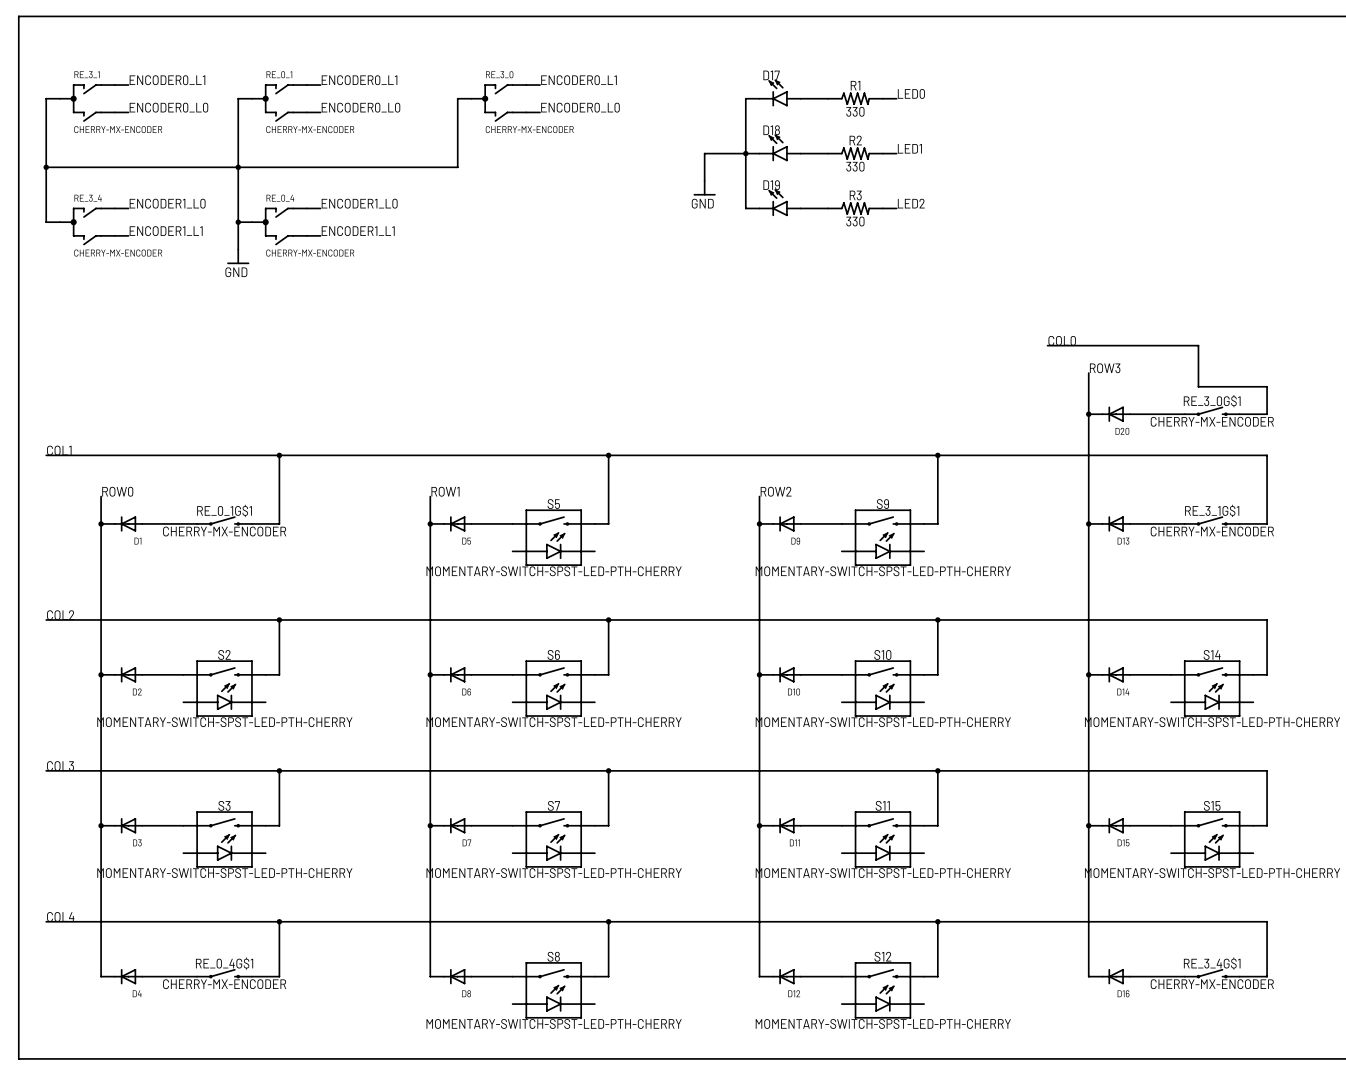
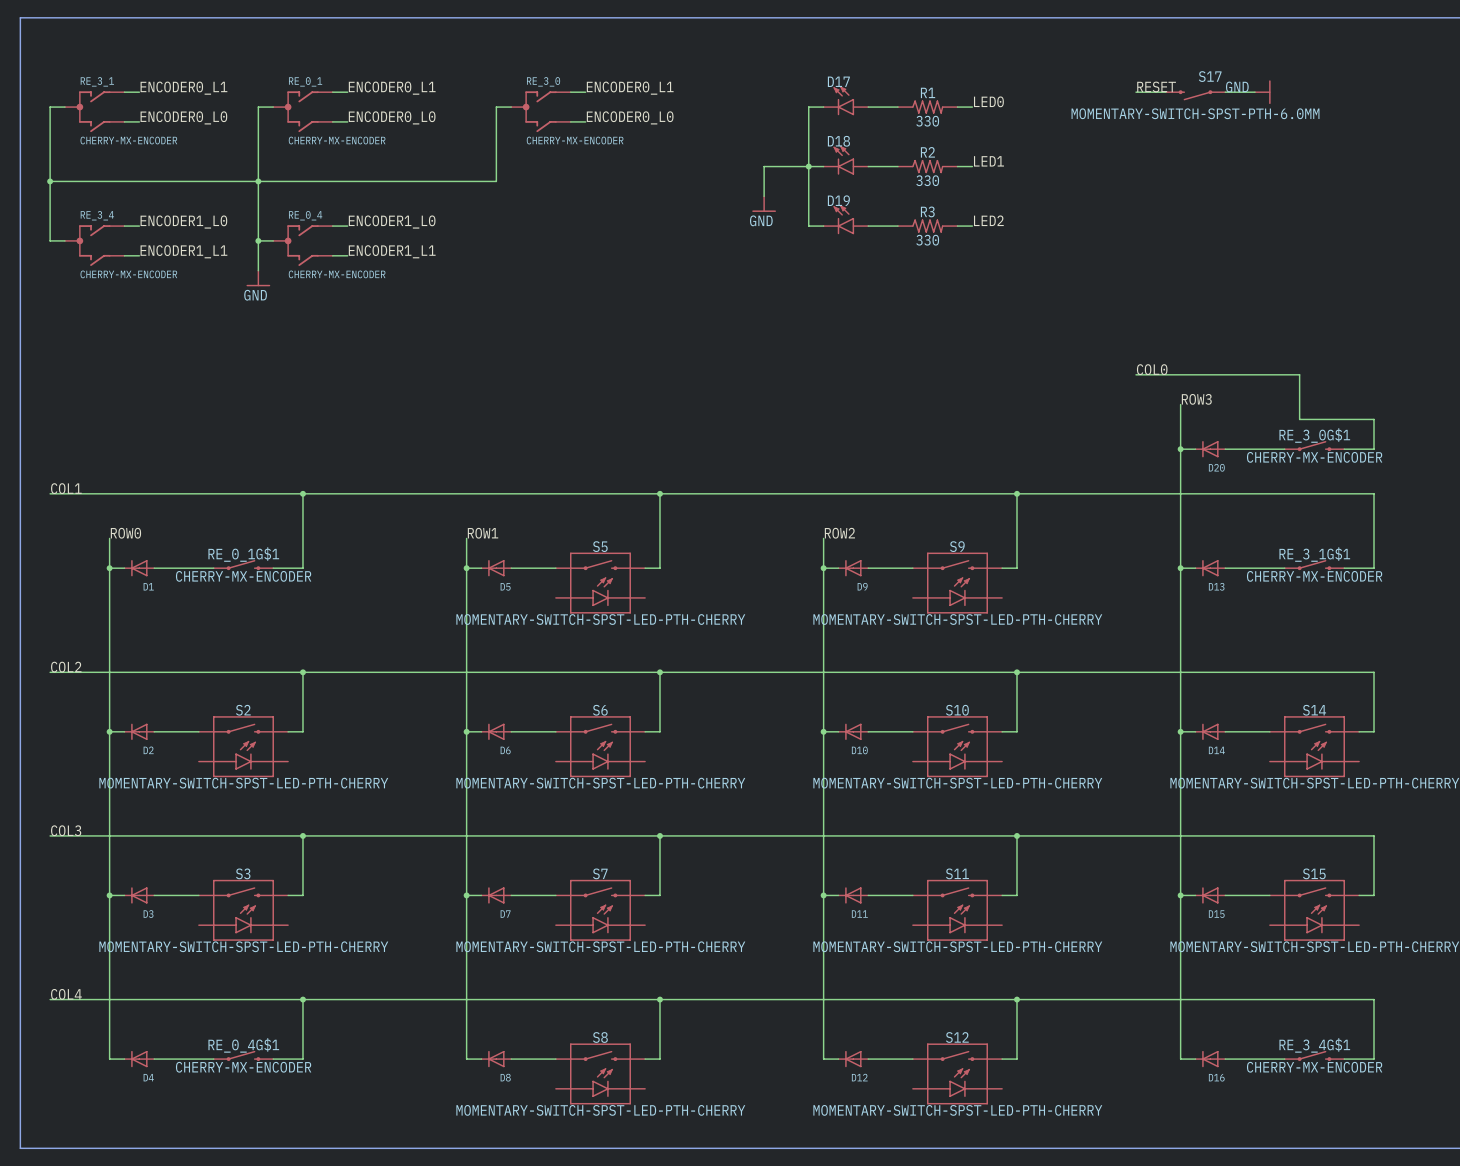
label: none -> RESET (1156, 86)
wire: none -> (1136, 92) (1165, 92)
wire: none -> (1225, 92) (1255, 92)
power symbol: none -> GND (1262, 92)
S17: none -> MOMENTARY-SWITCH-SPST-PTH-6.0MM (1195, 95)

